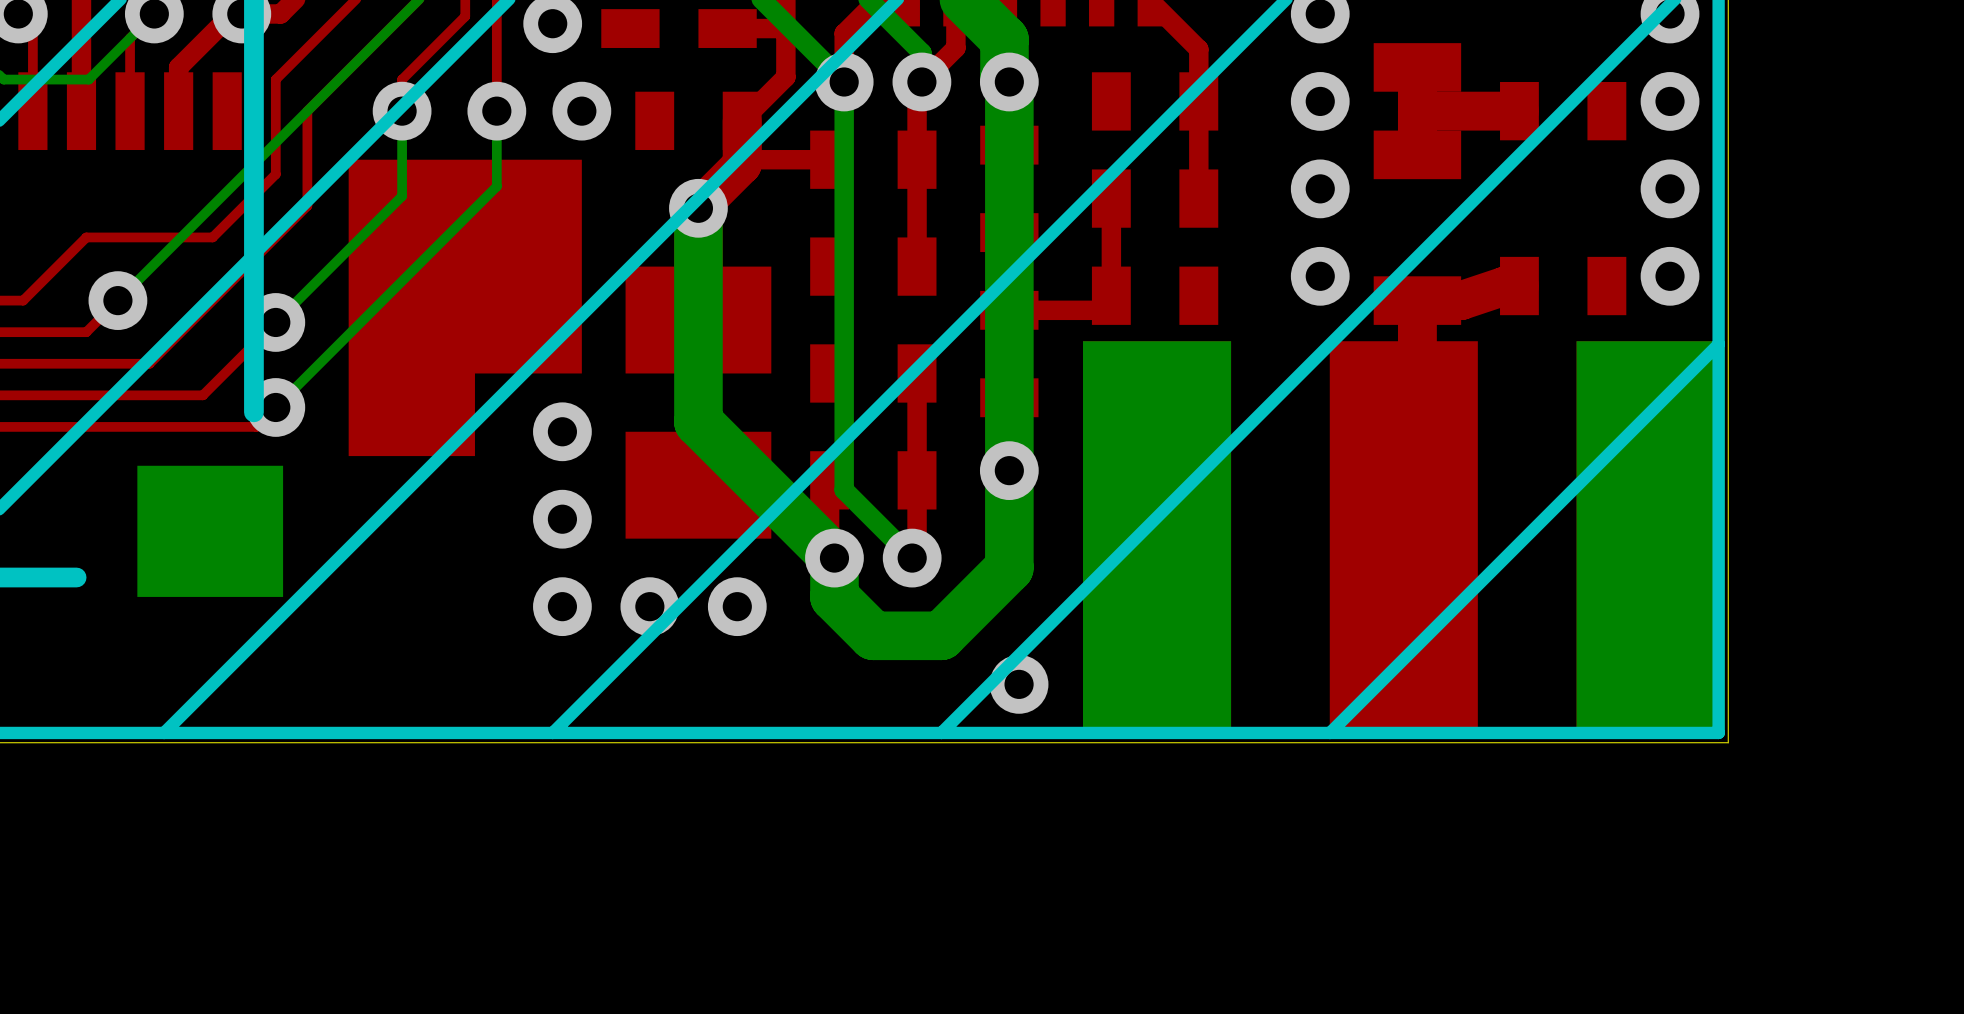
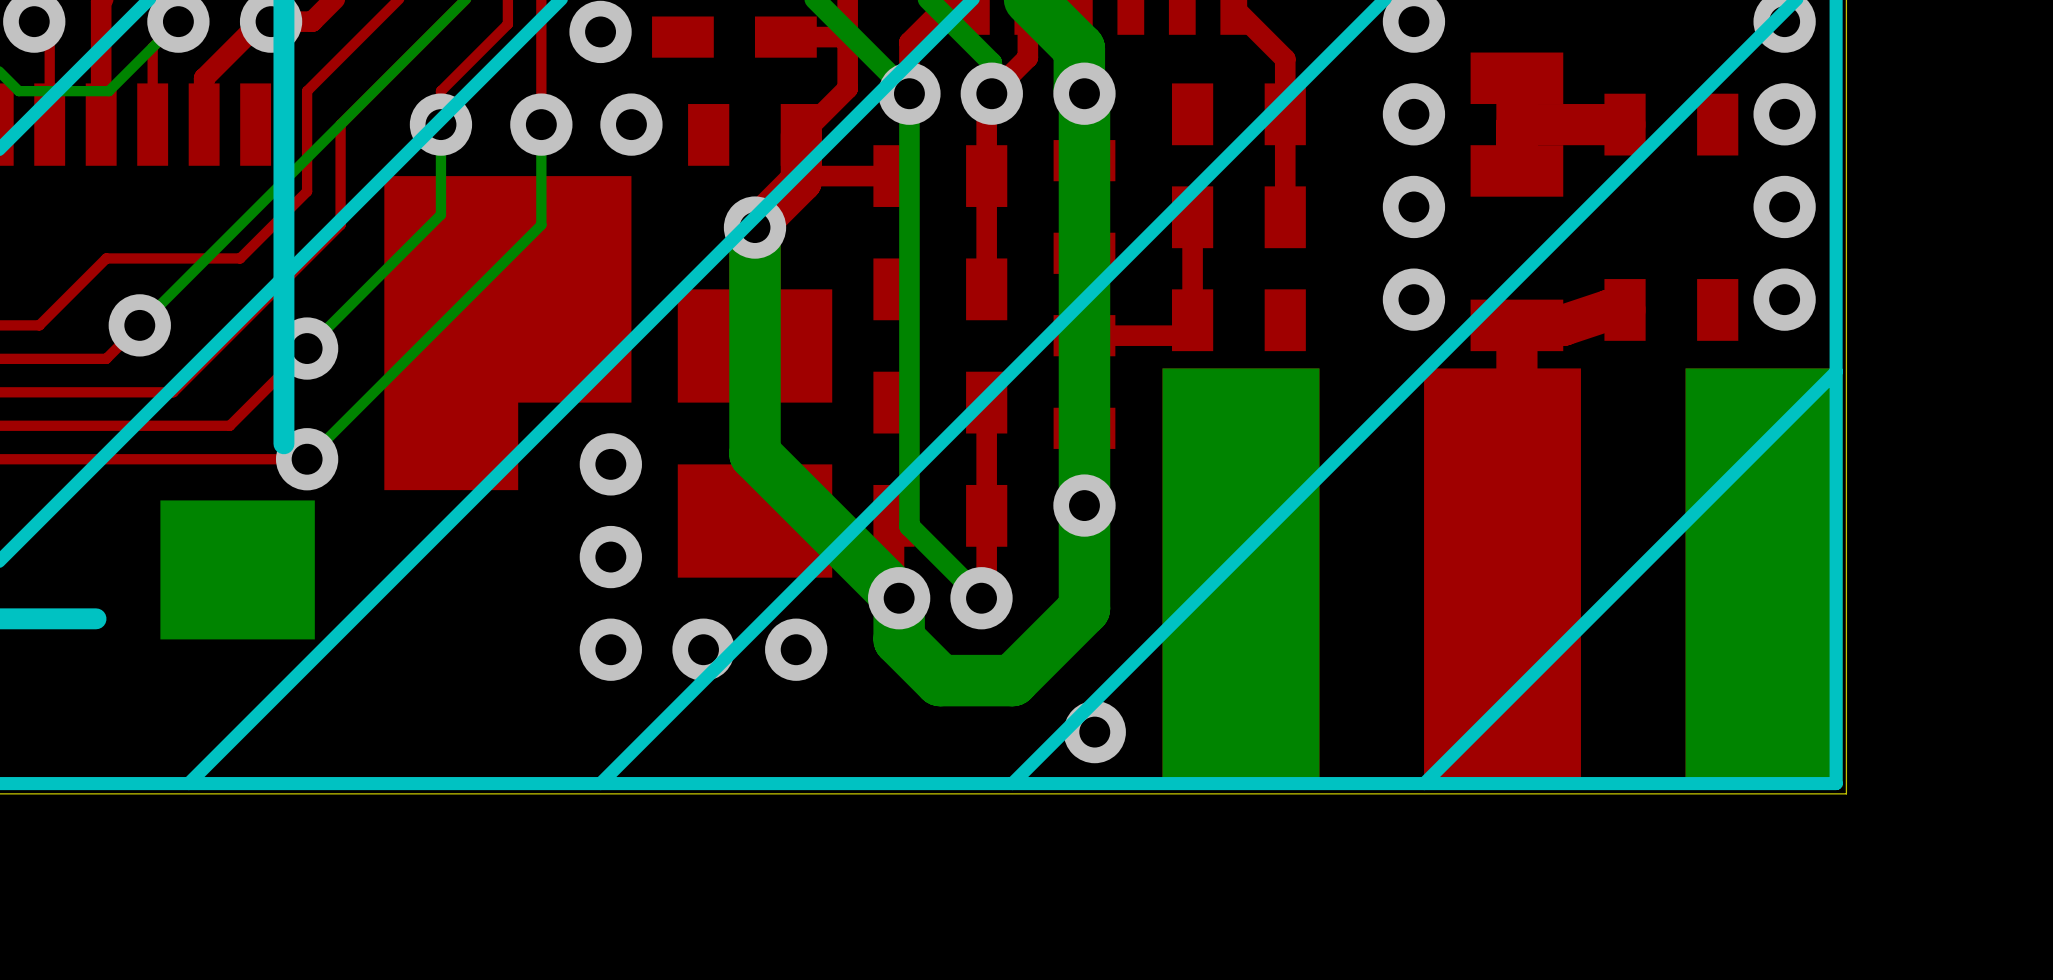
bottom track: (496, 186) (275, 407) -> (541, 204) (541, 224) (307, 459)
via position: (275, 407) -> (307, 459)

